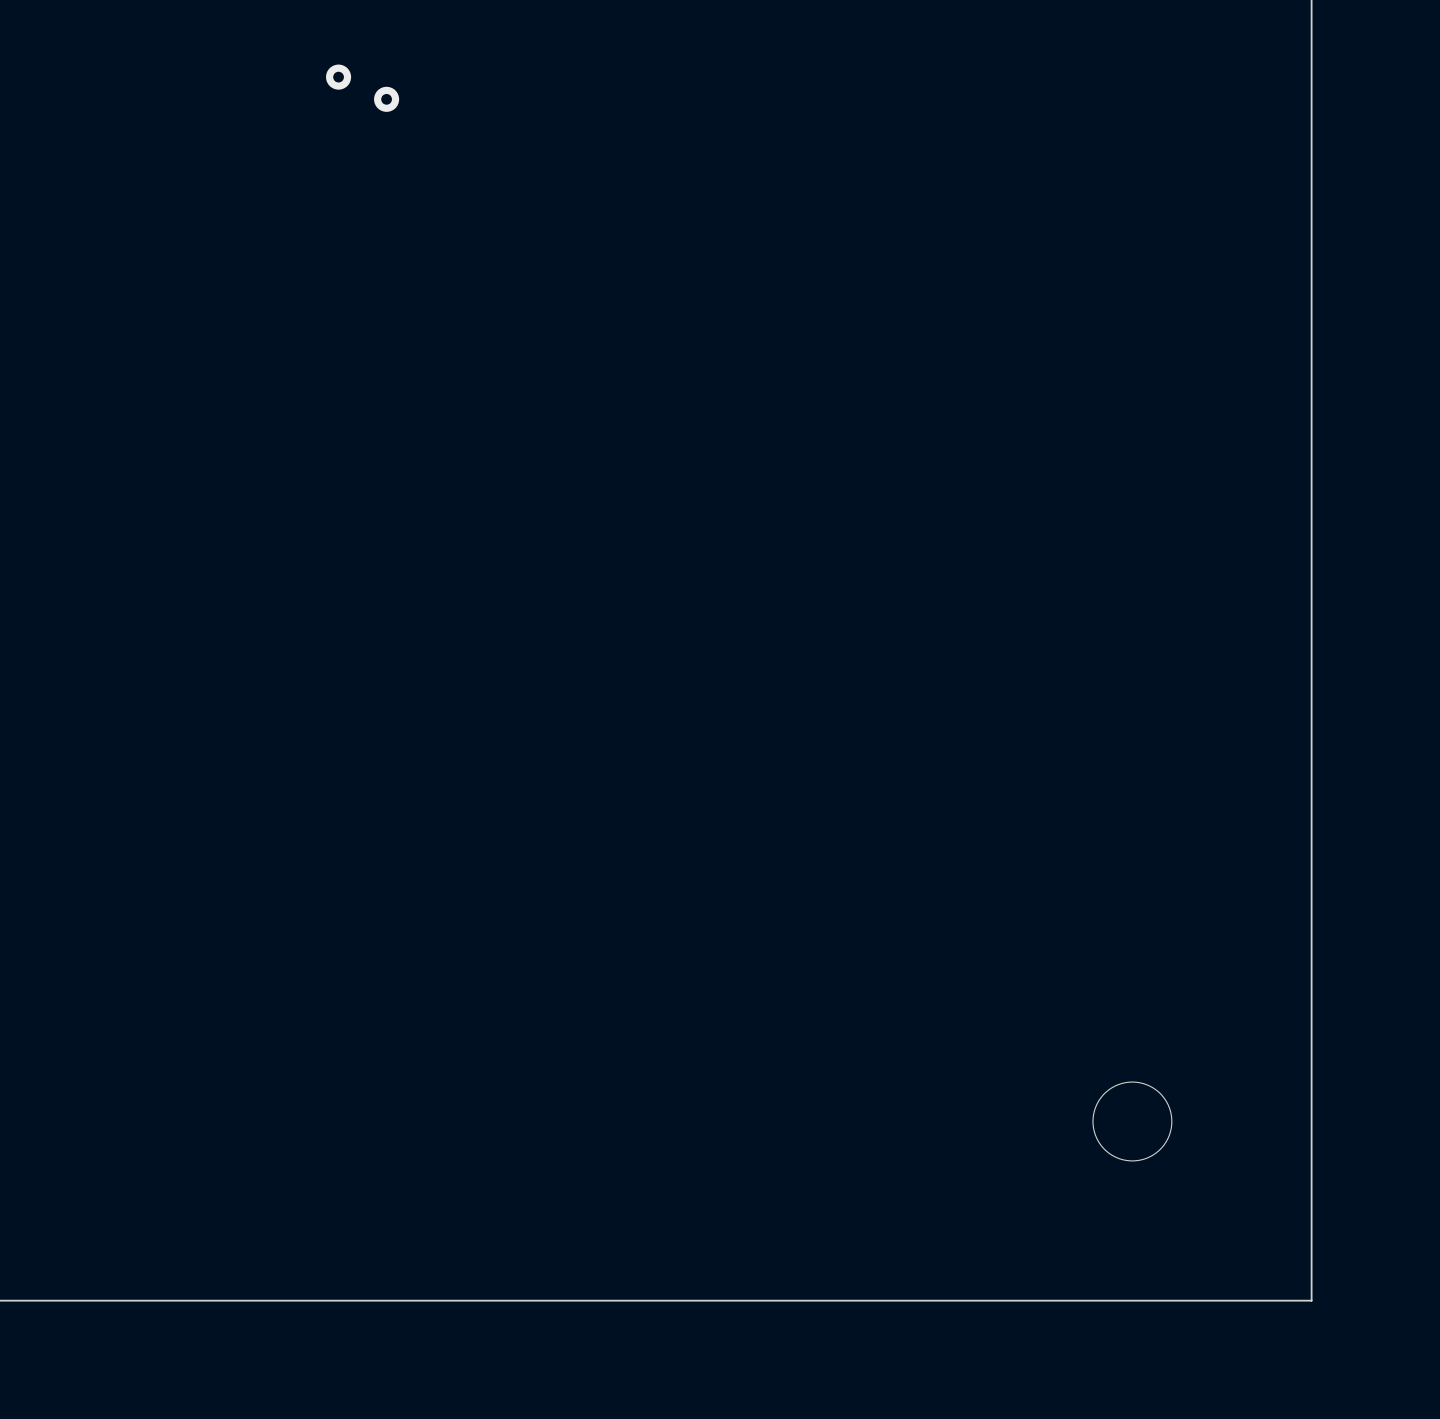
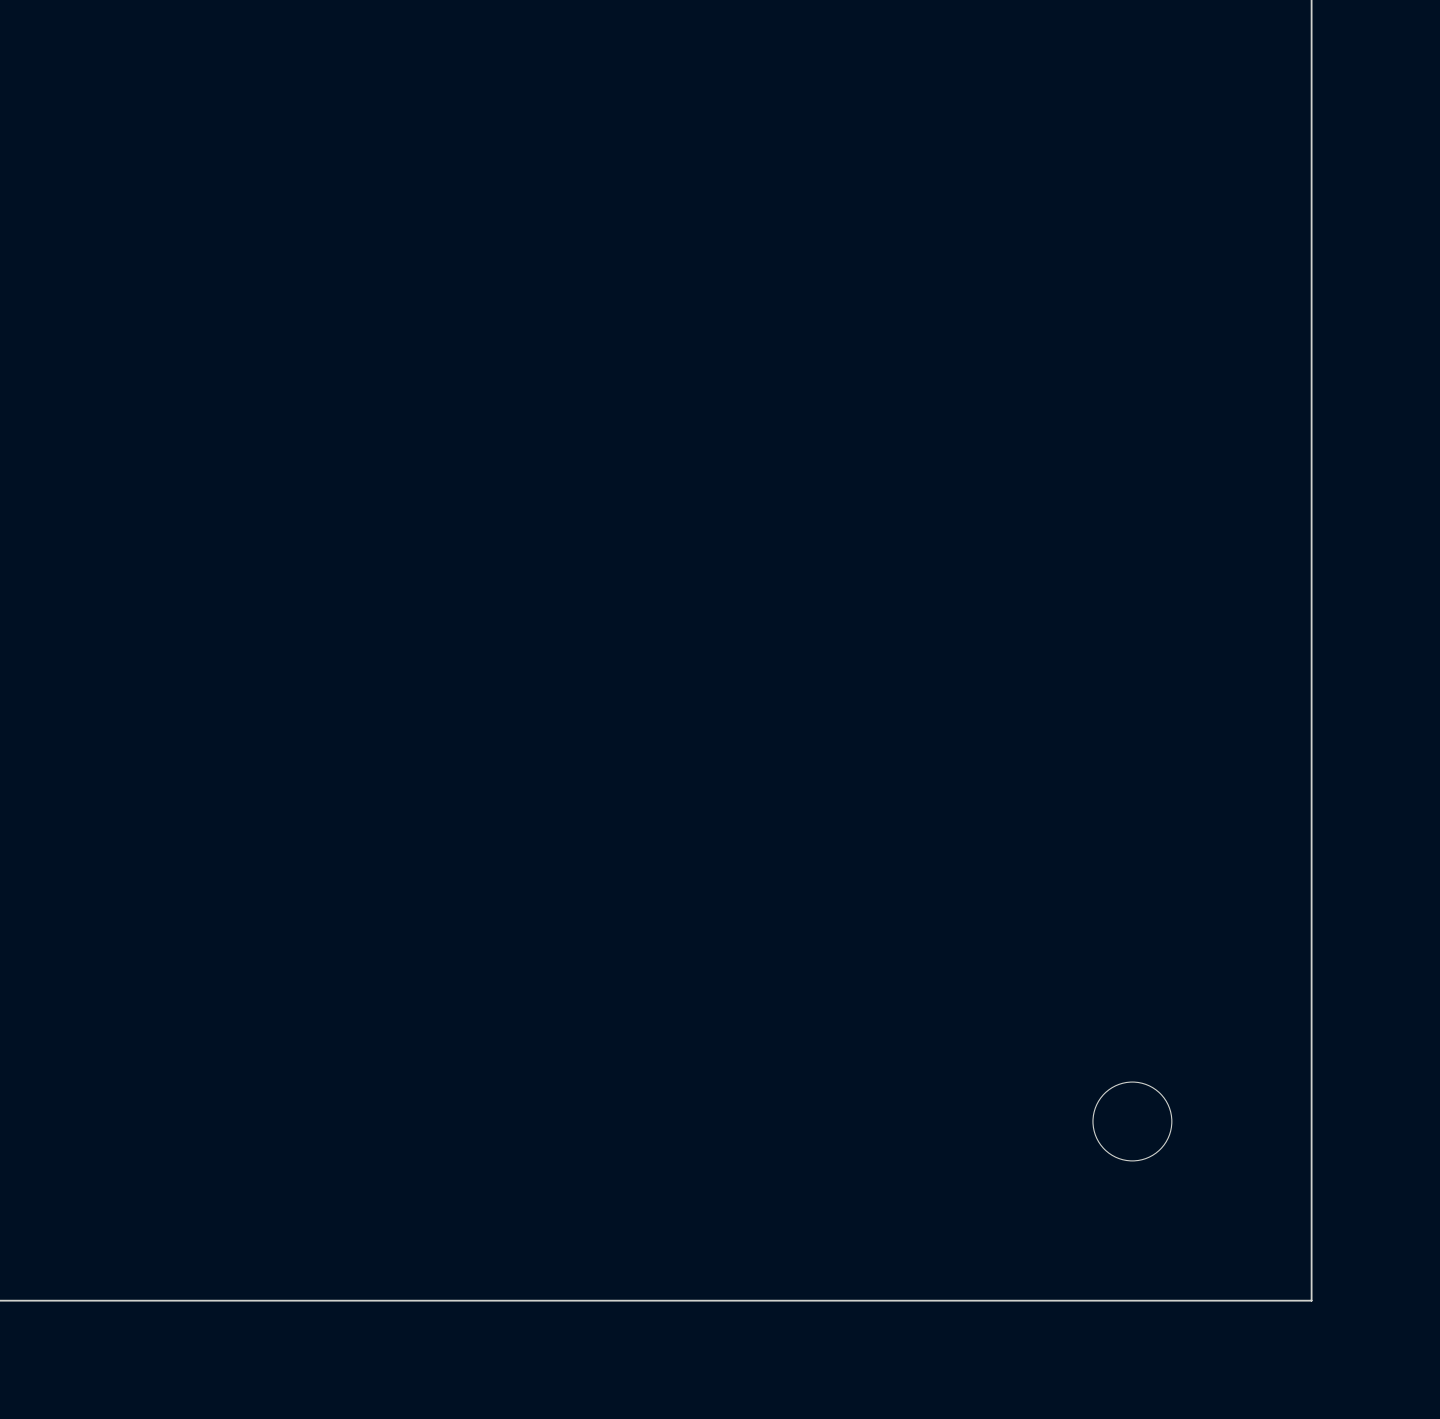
via: (338, 77) -> none
via: (386, 99) -> none

